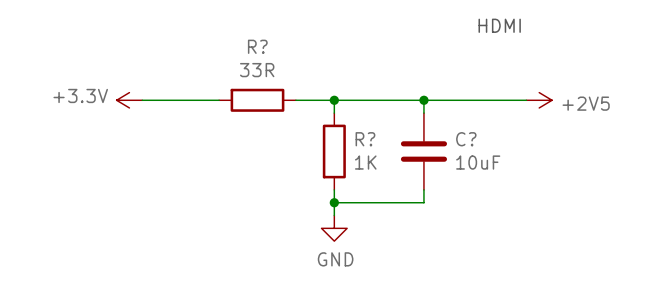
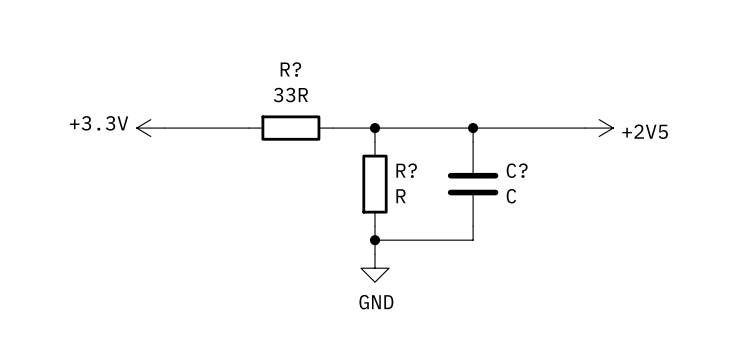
text: HDMI (499, 25) -> none
R? value: 1K (365, 162) -> R (401, 196)
C? value: 10uF (478, 162) -> C (511, 196)

